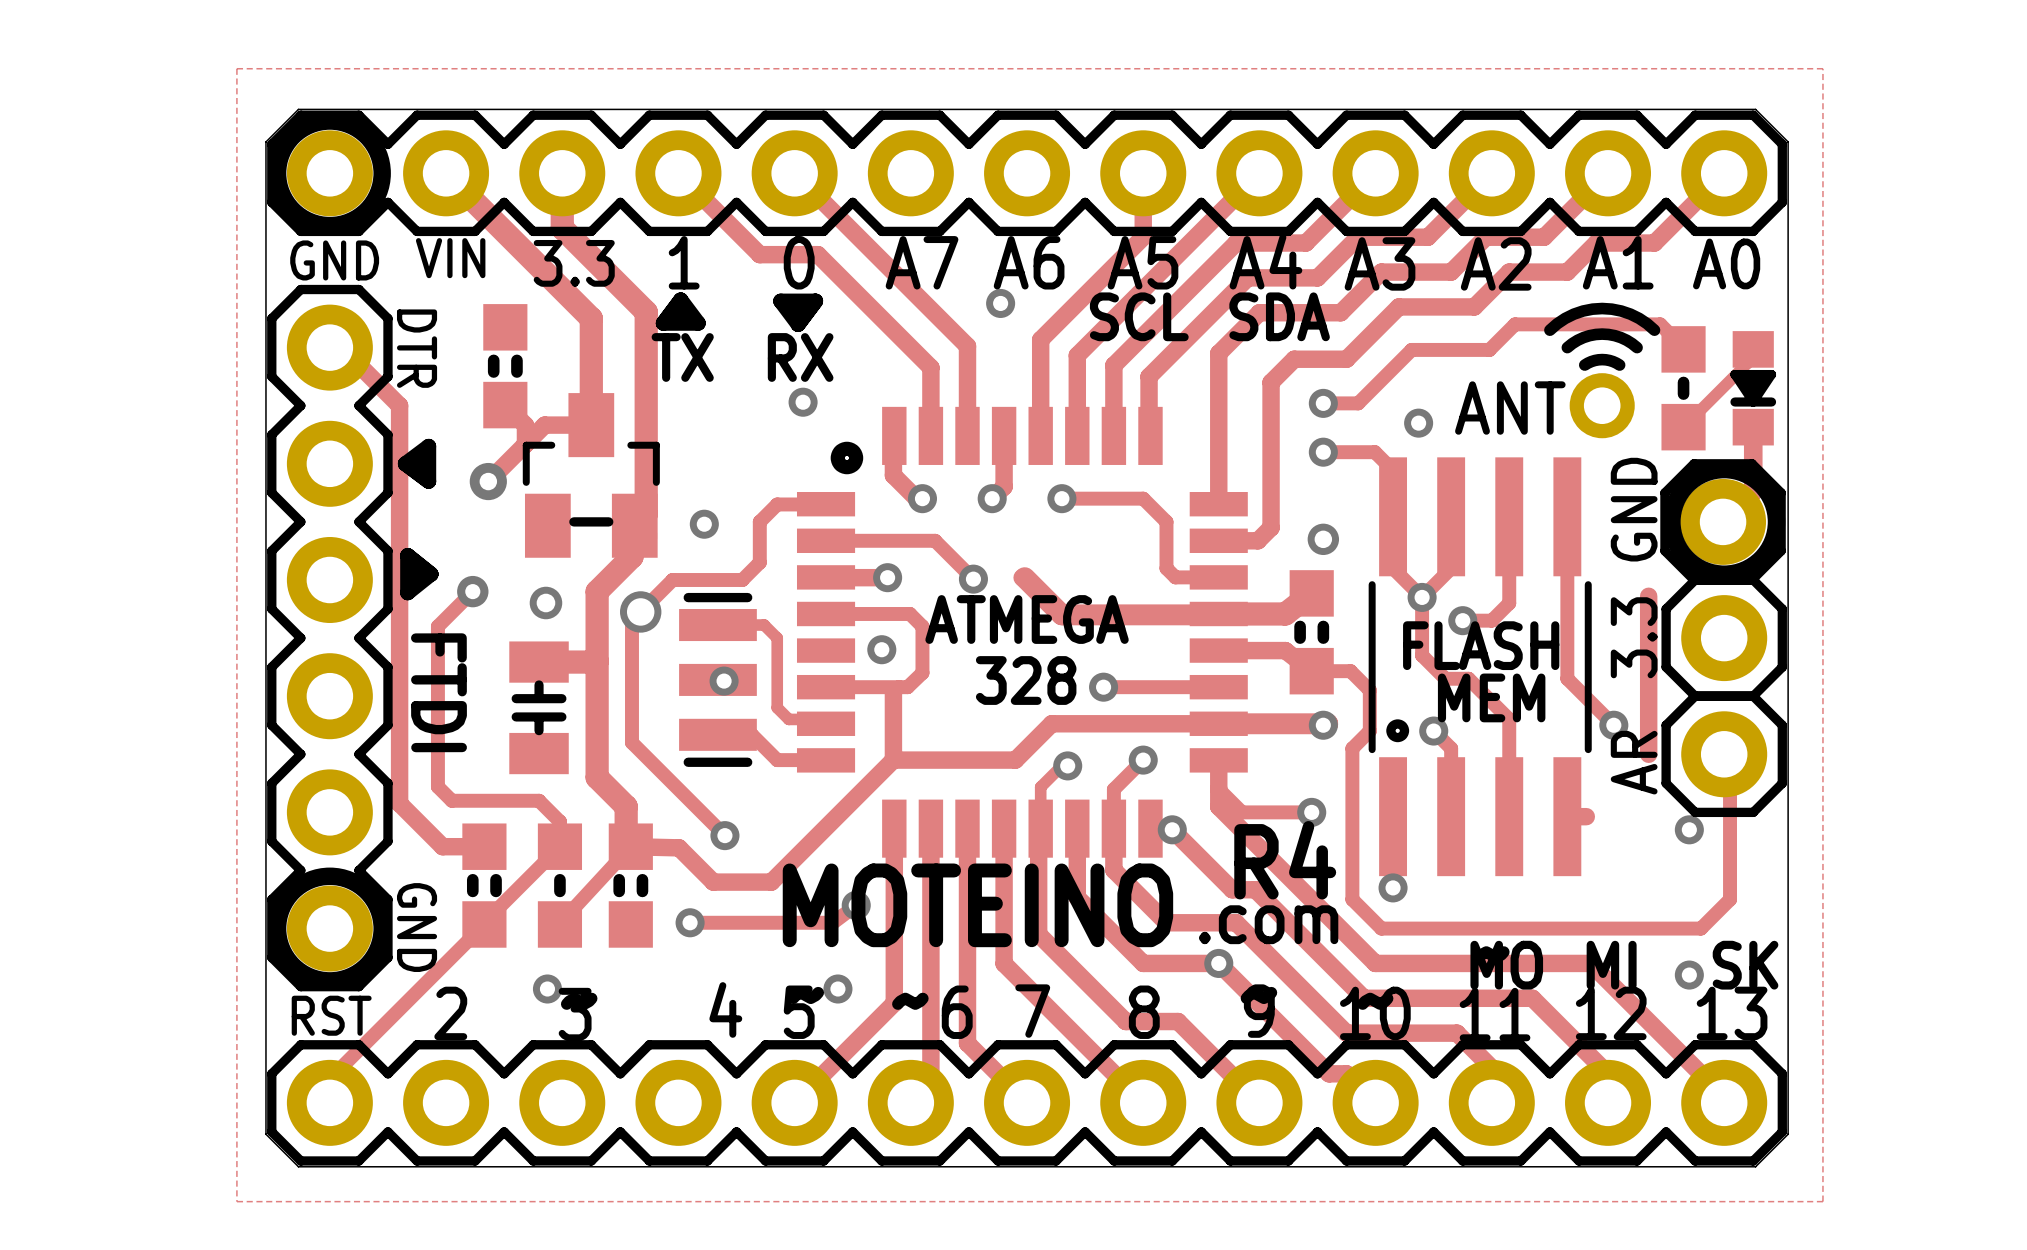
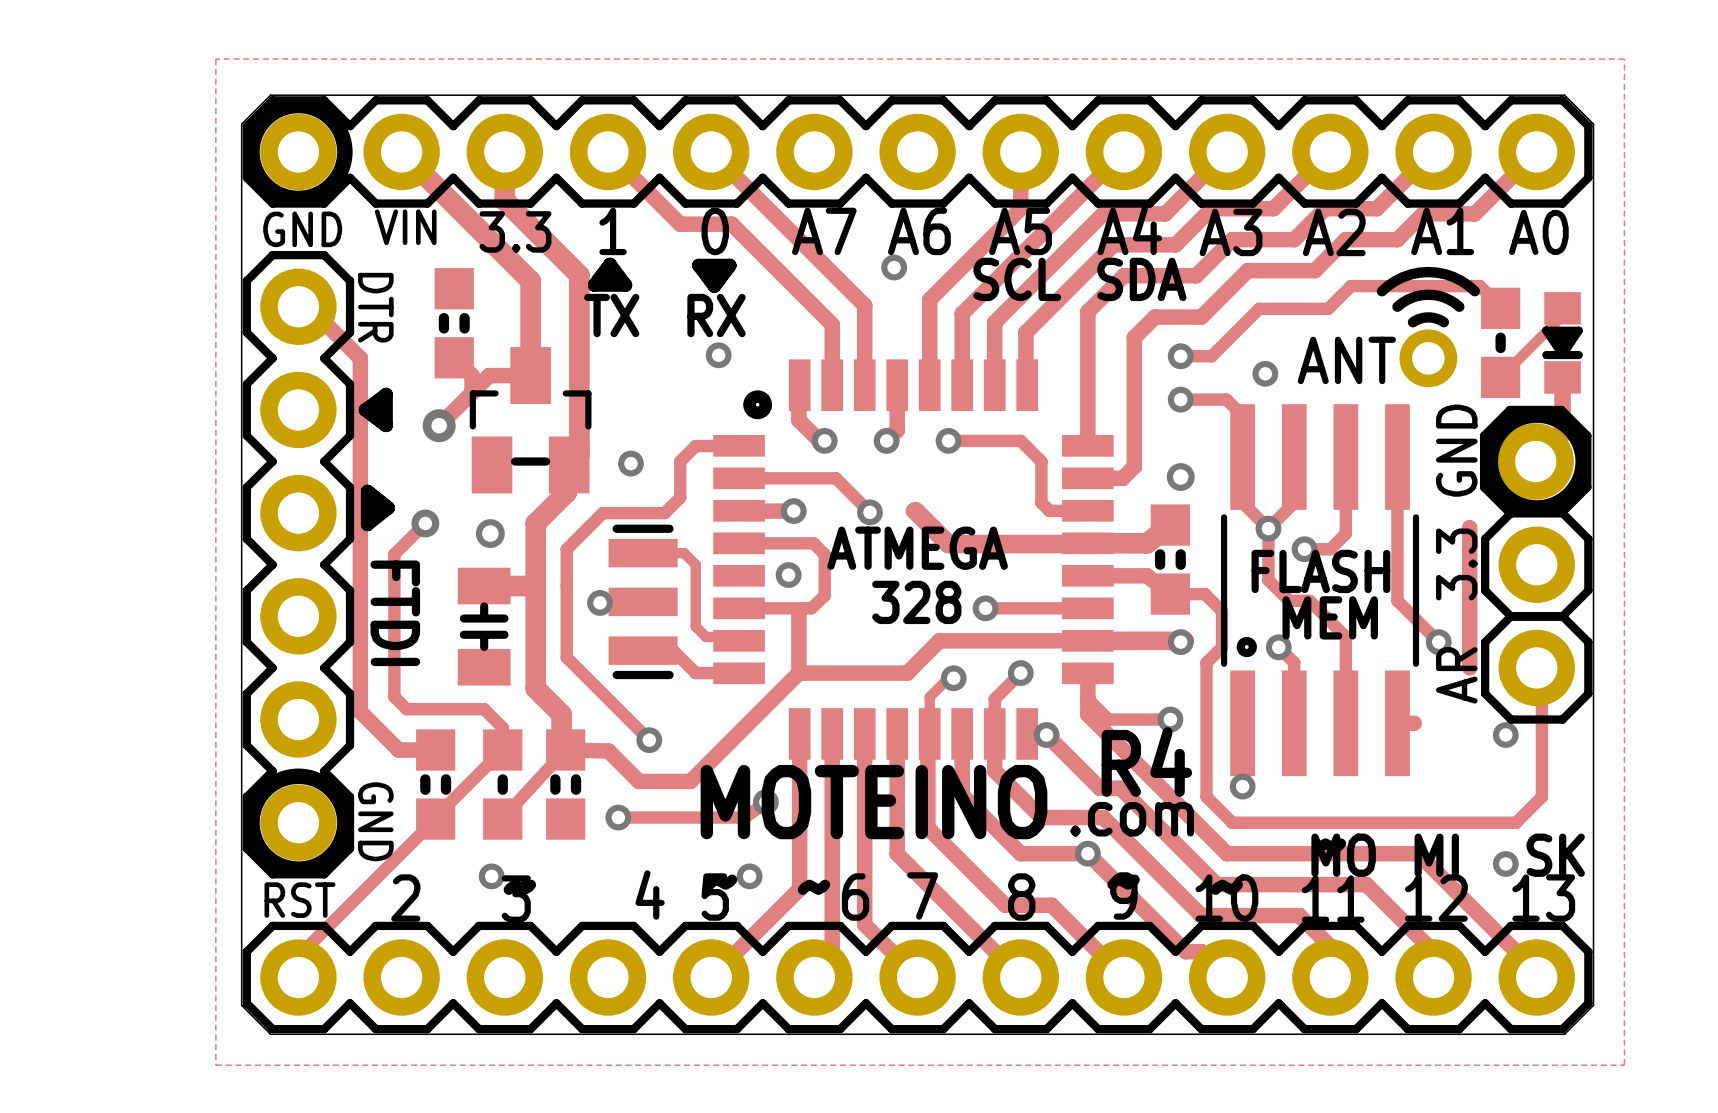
via: (640, 611) -> none
via position: (724, 681) -> (600, 602)

